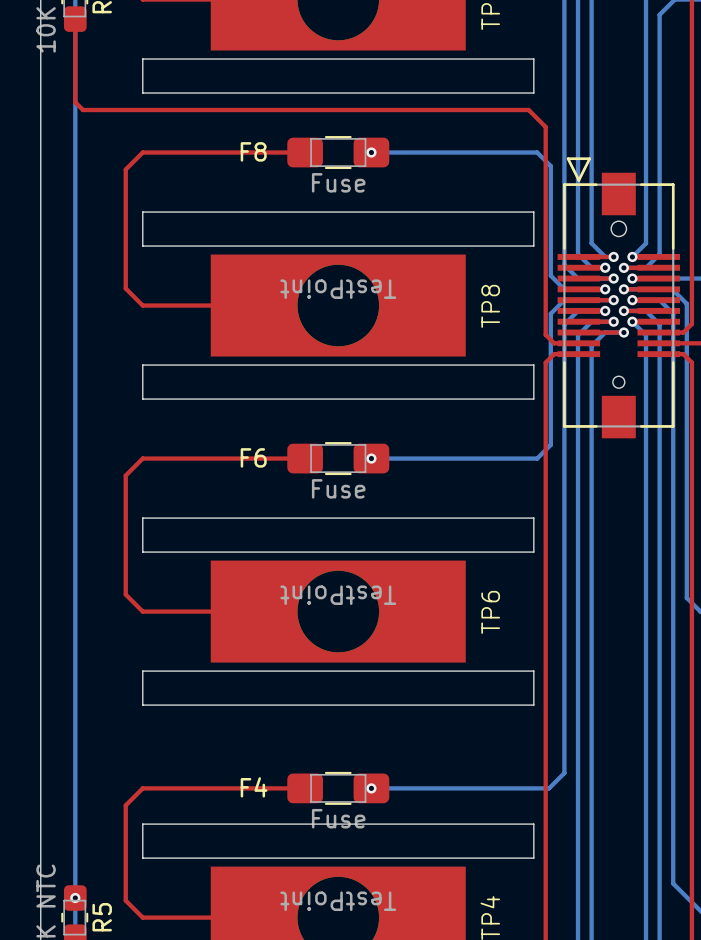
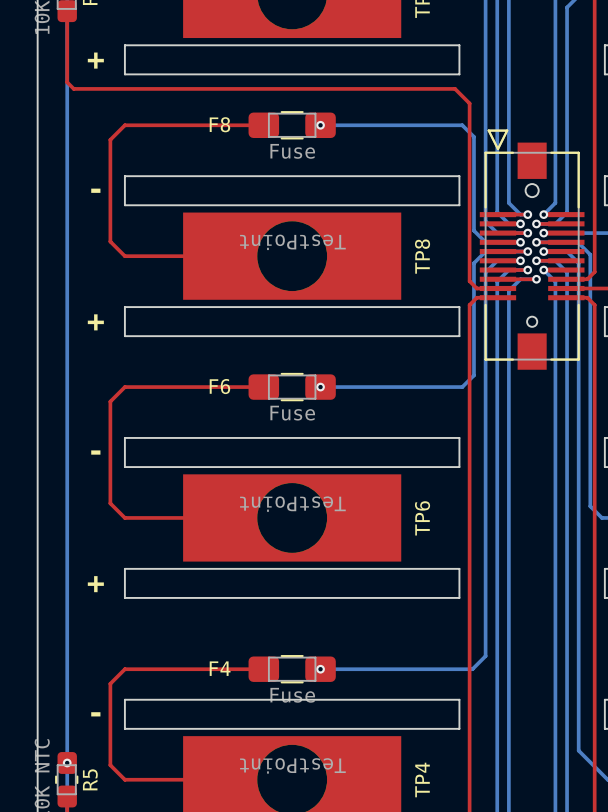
text: none -> + (95, 60)
text: none -> - (95, 190)
text: none -> + (95, 322)
text: none -> - (95, 452)
text: none -> + (95, 584)
text: none -> - (95, 714)

